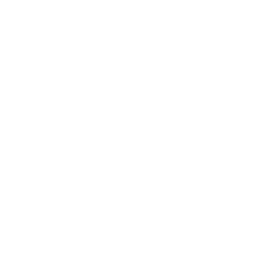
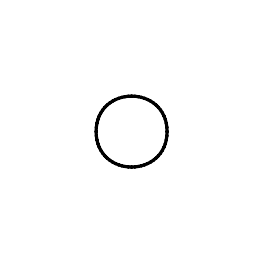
board edge: none -> (131, 96) (147, 99) (158, 107) (165, 119) (167, 131) (165, 143) (158, 155) (147, 163) (131, 167) (115, 163) (104, 155) (97, 143) (96, 131) (97, 119) (104, 107) (115, 99) (131, 96)

